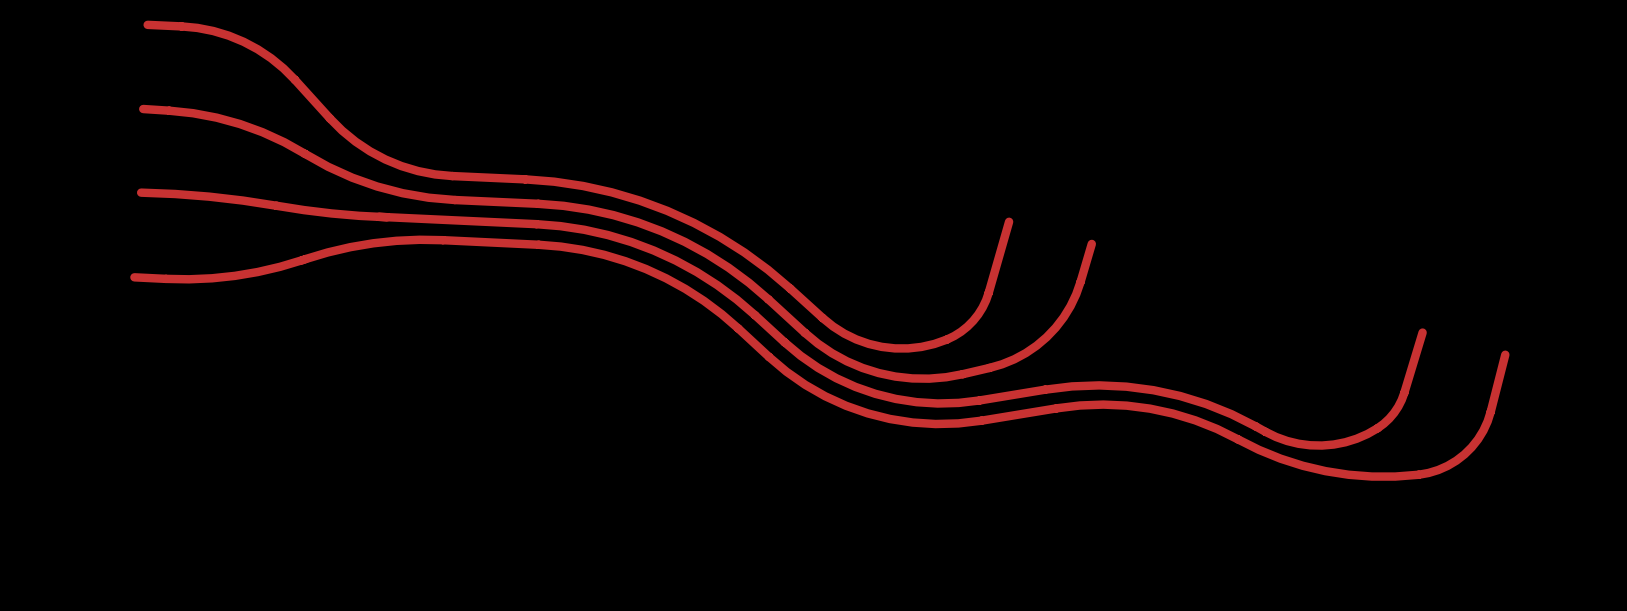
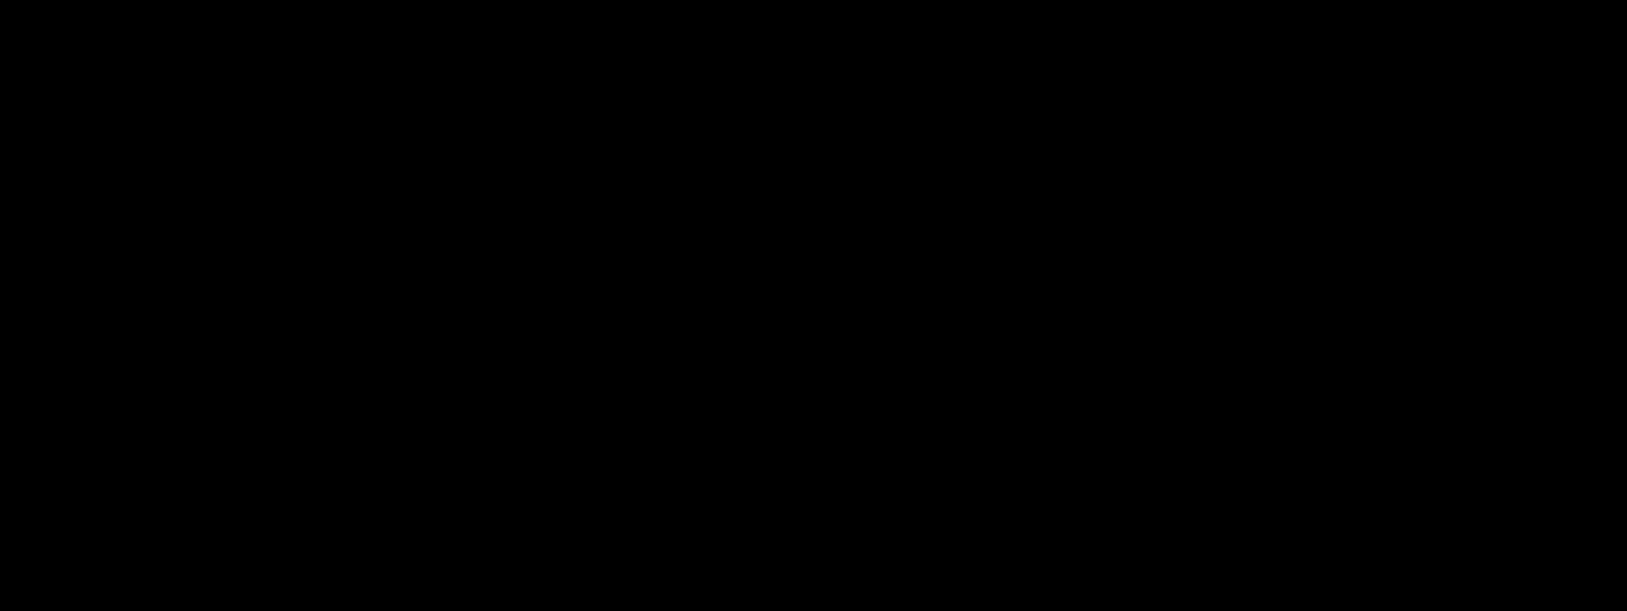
top track: (147, 24) (181, 26) (213, 31) (243, 41) (257, 49) (283, 68) (329, 118) (355, 141) (385, 159) (401, 166) (435, 174) (525, 179) (583, 186) (611, 192) (667, 210) (719, 236) (744, 252) (768, 269) (822, 318) (844, 333) (856, 339) (881, 346) (908, 348) (934, 343) (954, 336) (967, 326) (978, 314) (986, 300) (1009, 221) -> none
top track: (143, 109) (193, 113) (239, 124) (284, 142) (352, 177) (402, 193) (454, 200) (563, 205) (613, 215) (637, 222) (684, 241) (728, 267) (749, 282) (817, 343) (832, 353) (862, 367) (895, 376) (912, 378) (946, 377) (1002, 364) (1025, 353) (1055, 327) (1070, 306) (1080, 281) (1091, 243) -> none
top track: (141, 192) (209, 196) (331, 213) (386, 217) -> none
top track: (379, 216) (560, 226) (584, 229) (631, 241) (675, 260) (717, 285) (736, 299) (800, 355) (836, 378) (875, 393) (916, 402) (958, 402) (1072, 386) (1126, 386) (1180, 396) (1206, 404) (1287, 440) (1310, 445) (1333, 444) (1367, 434) (1383, 423) (1394, 412) (1404, 392) (1422, 332) -> none
top track: (134, 277) (189, 279) (235, 275) (280, 266) (350, 247) (396, 240) (442, 240) (538, 244) (582, 249) (604, 254) (645, 269) (685, 288) (721, 314) (768, 356) (805, 384) (825, 396) (867, 413) (912, 422) (958, 423) (1079, 405) (1126, 405) (1172, 413) (1195, 420) (1258, 449) (1302, 465) (1325, 471) (1371, 476) (1428, 472) (1447, 465) (1464, 454) (1478, 439) (1487, 421) (1505, 354) -> none

